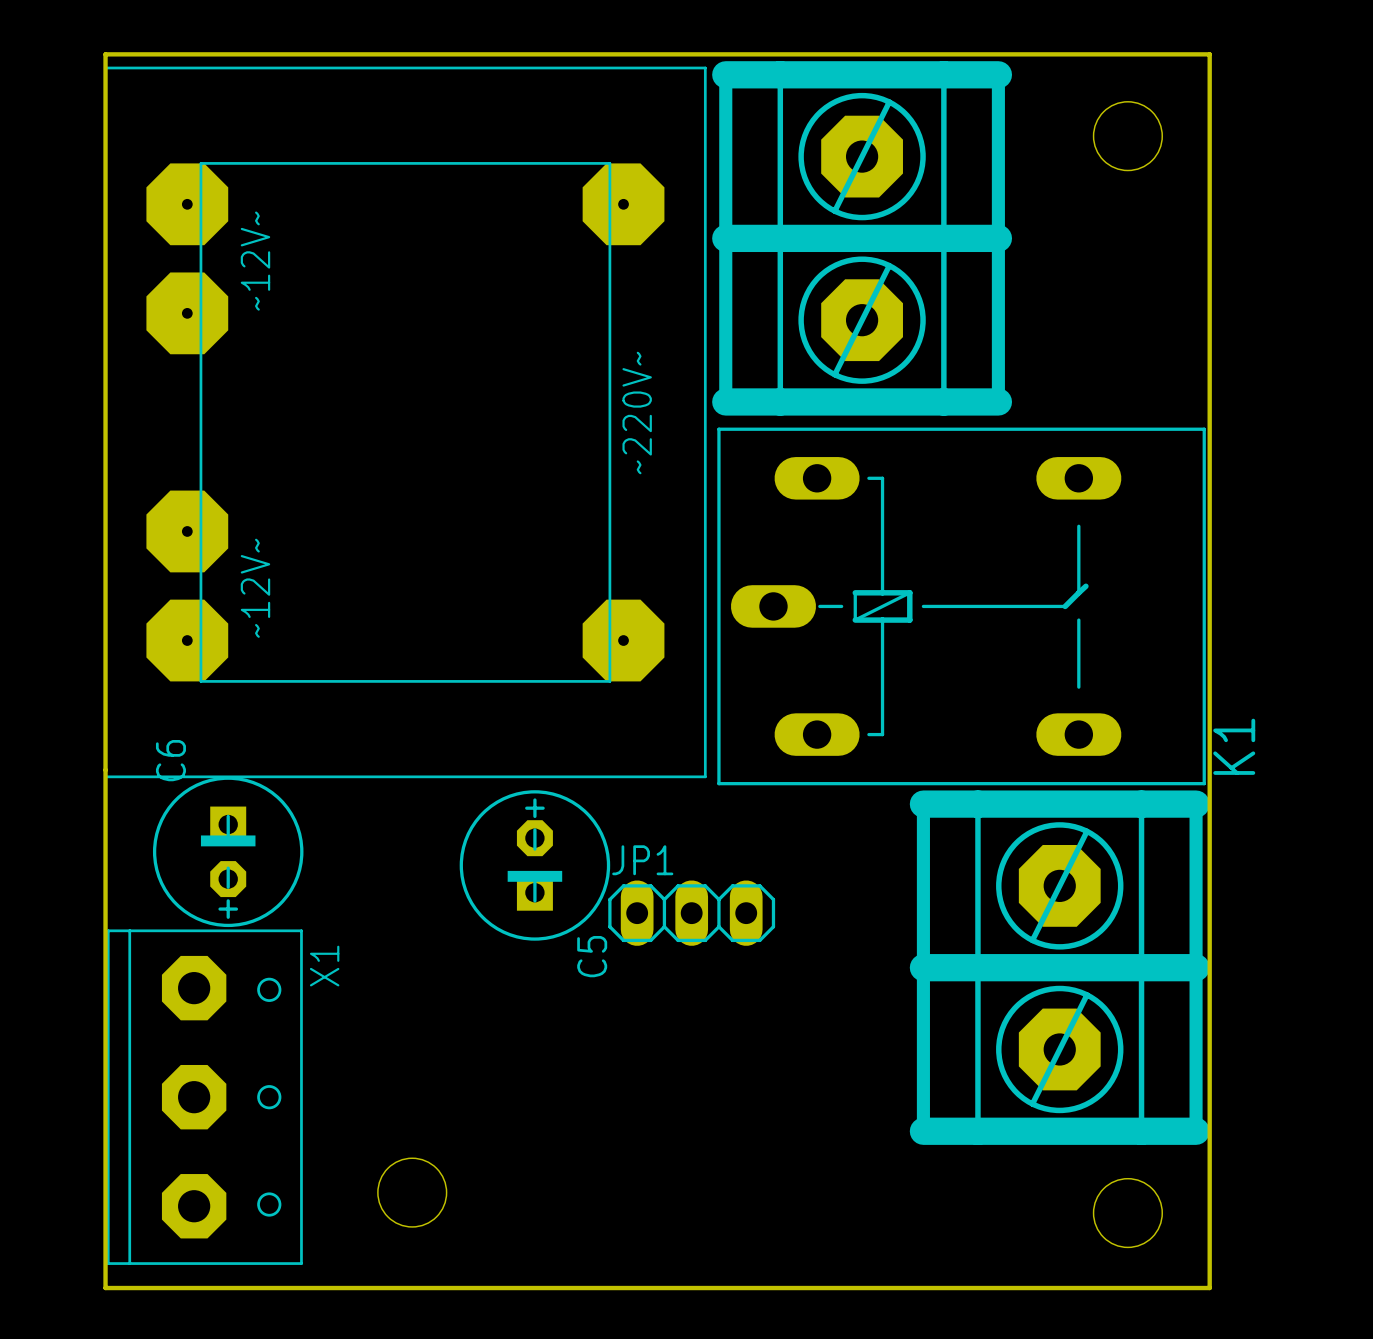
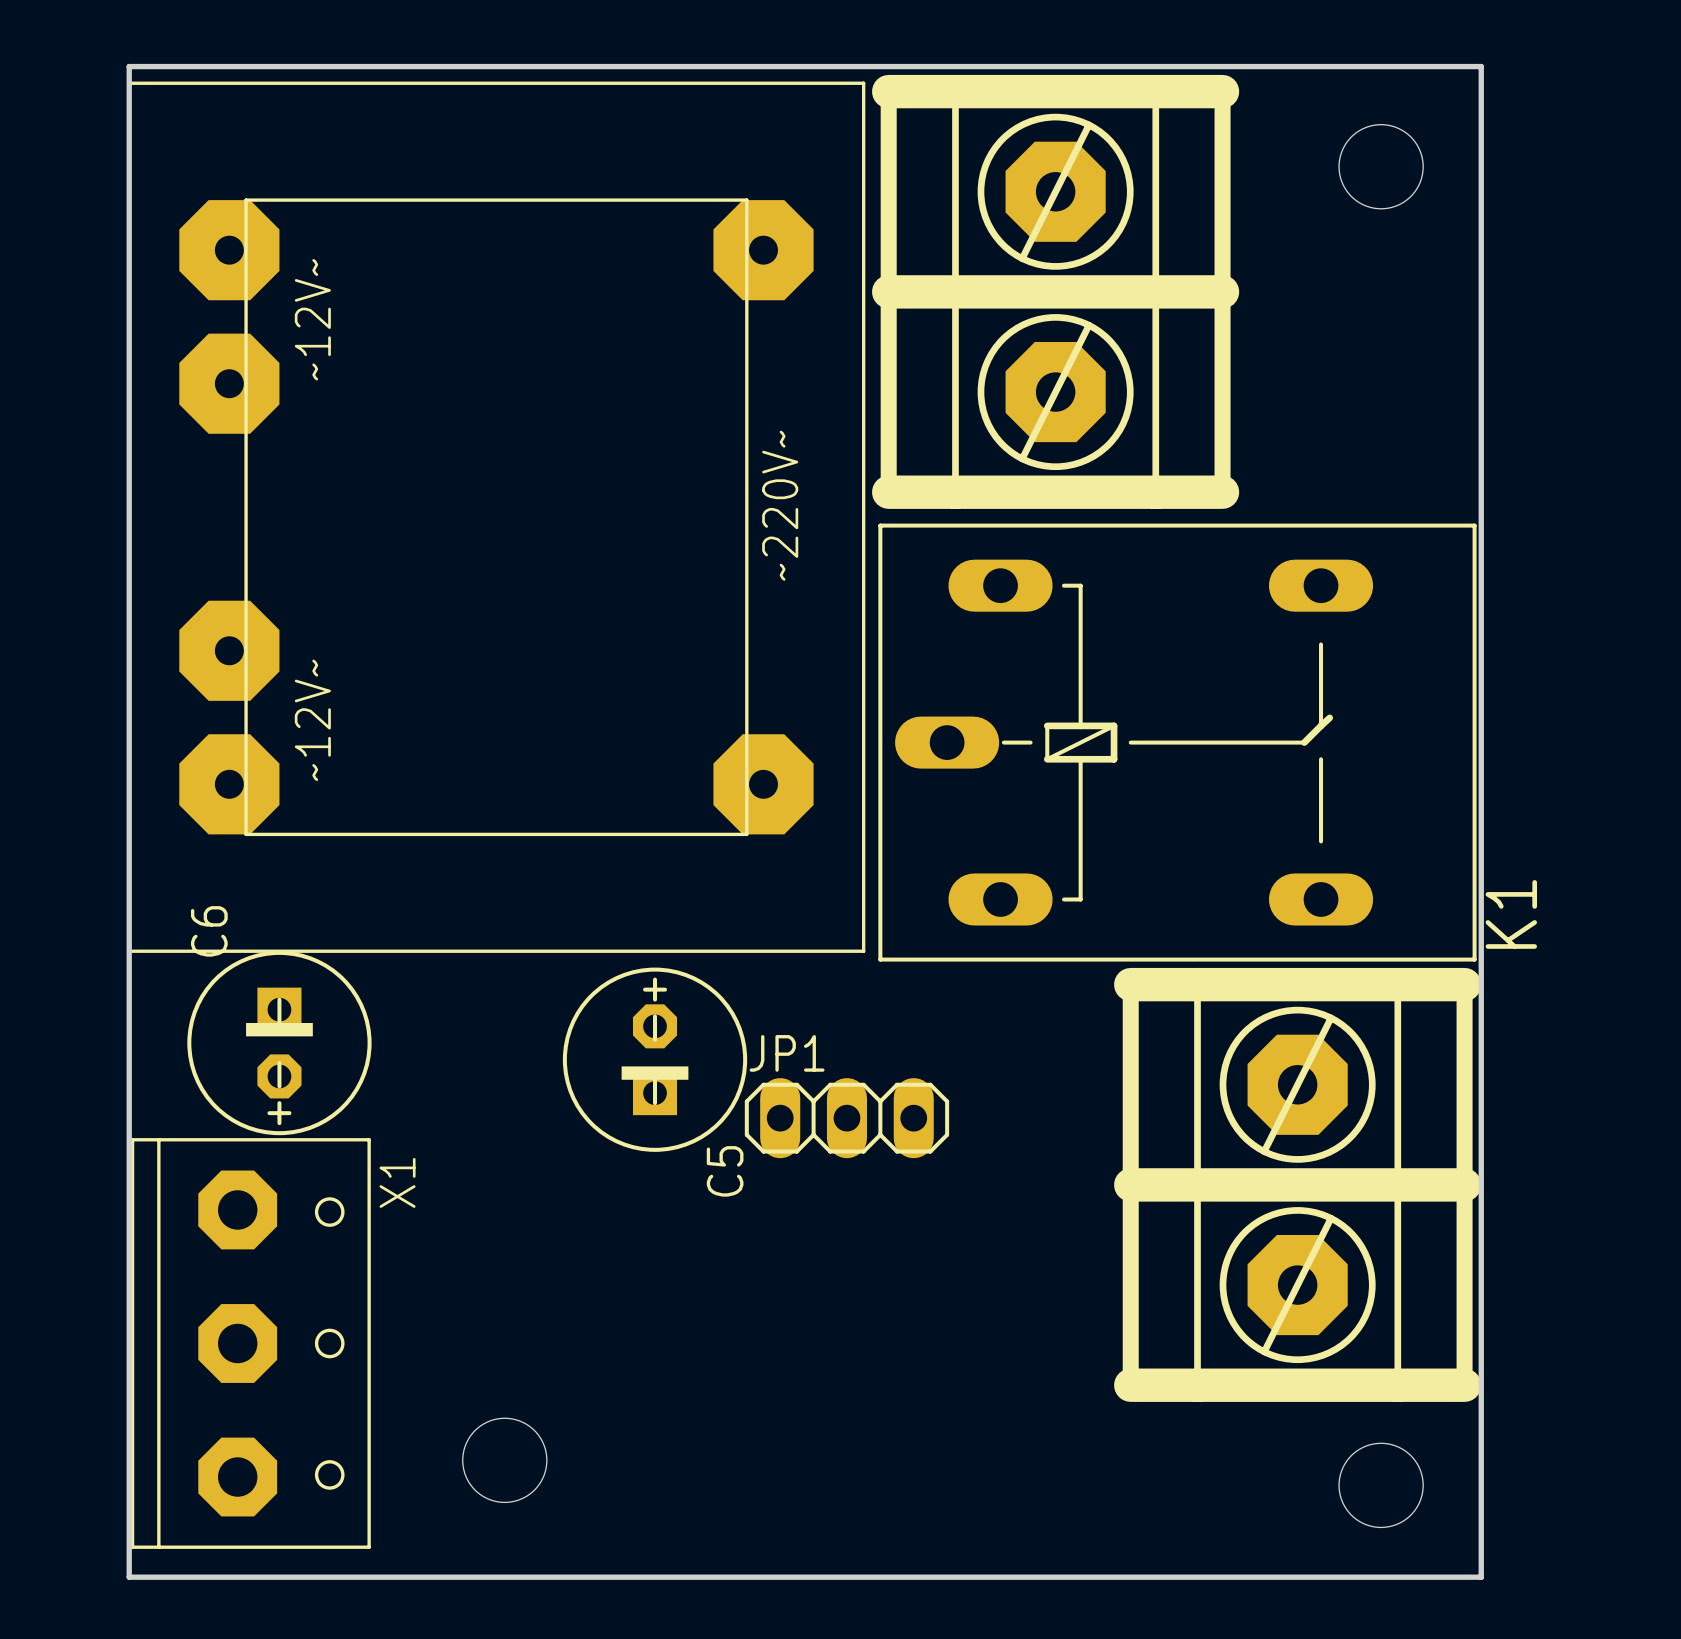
part footprint: [104, 66, 707, 779] -> [127, 81, 866, 953]

